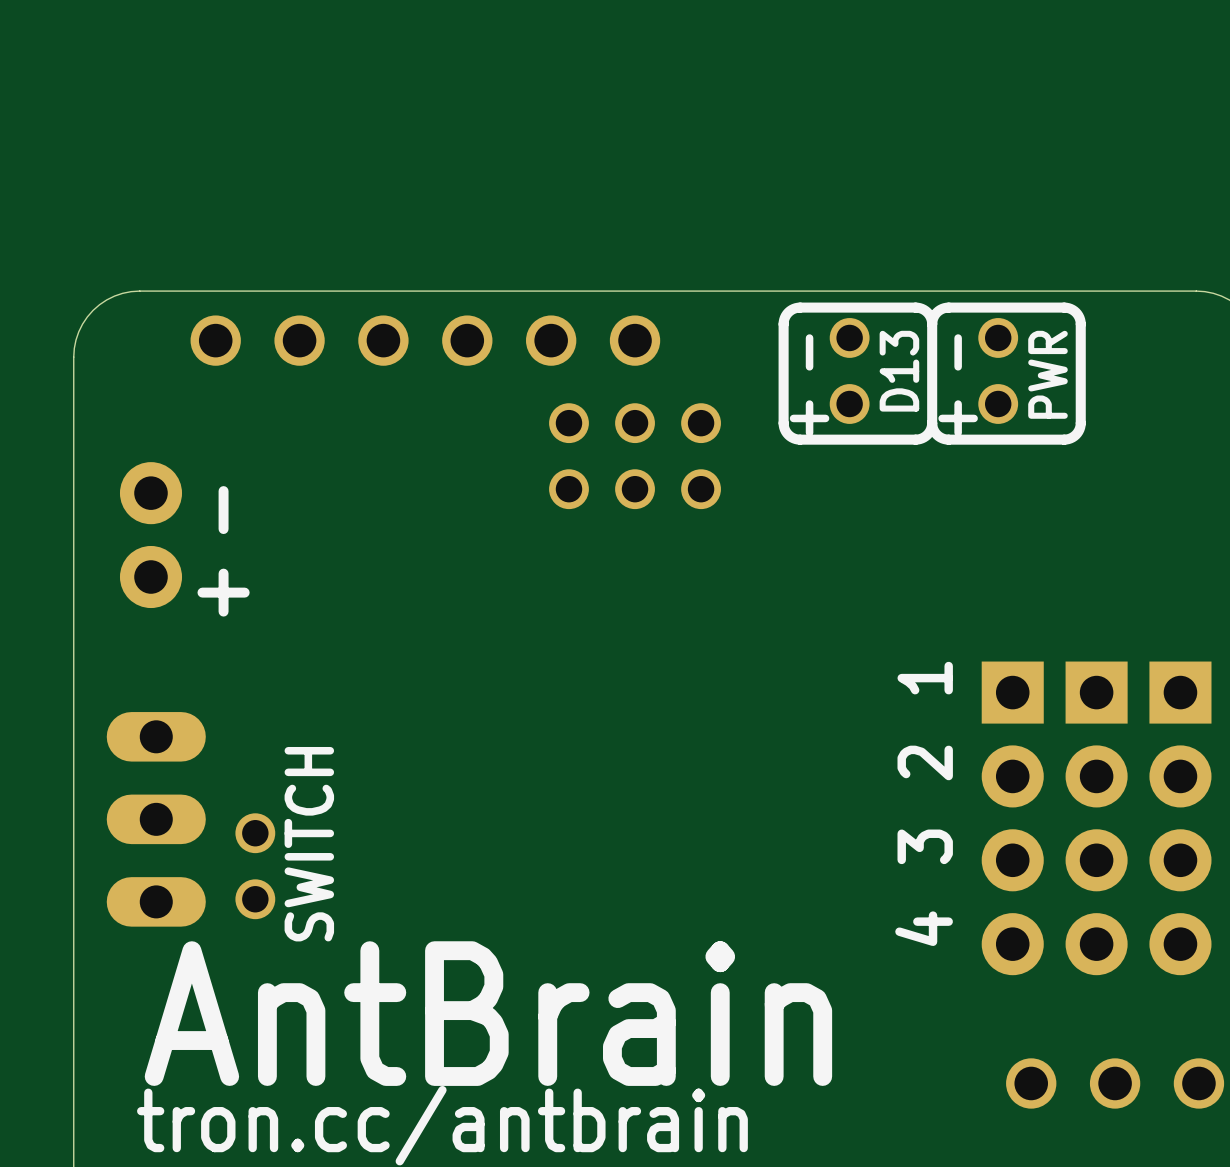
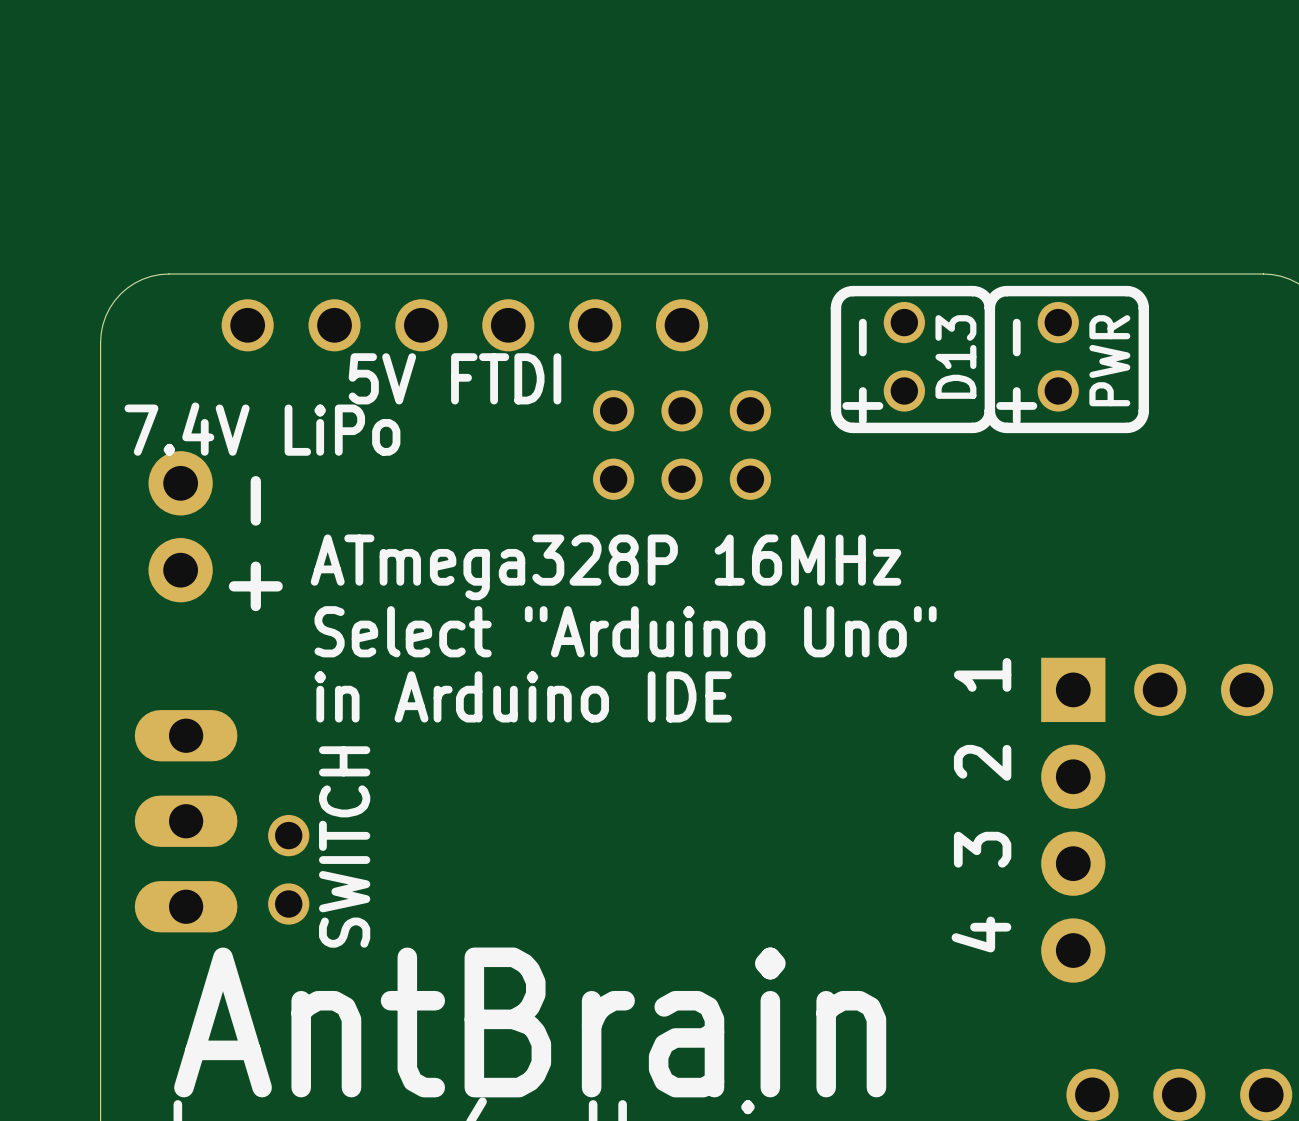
text: none -> 5V FTDI (454, 378)
text: none -> 7.4V LiPo (262, 429)
text: none -> ATmega328P 16MHz (606, 567)
text: none -> Select "Arduino Uno" (625, 631)
part: none -> (1160, 689)
part: none -> (1247, 689)
text: none -> in Arduino IDE (523, 696)
part: (1096, 818) -> none
part: (1180, 818) -> none

